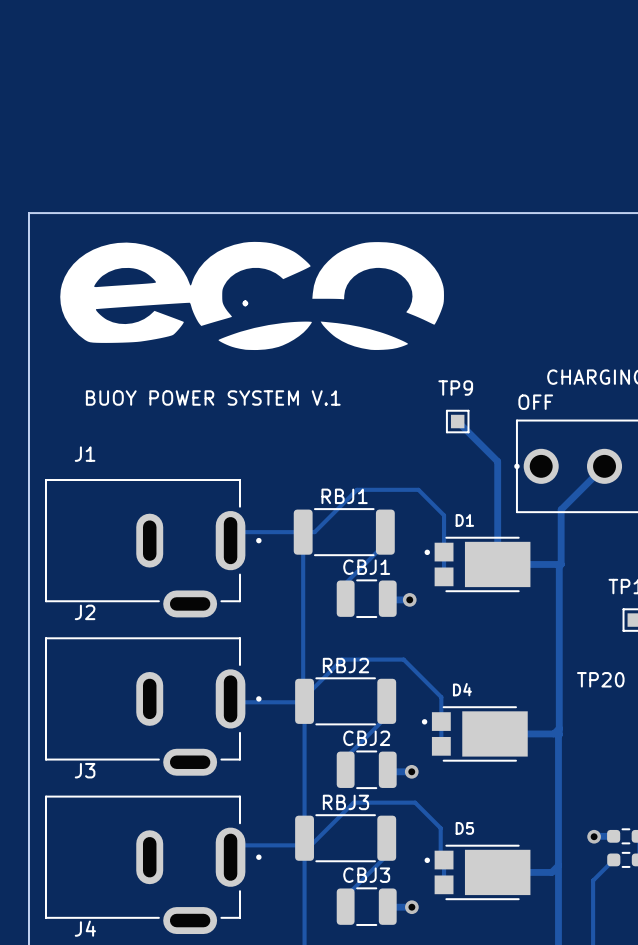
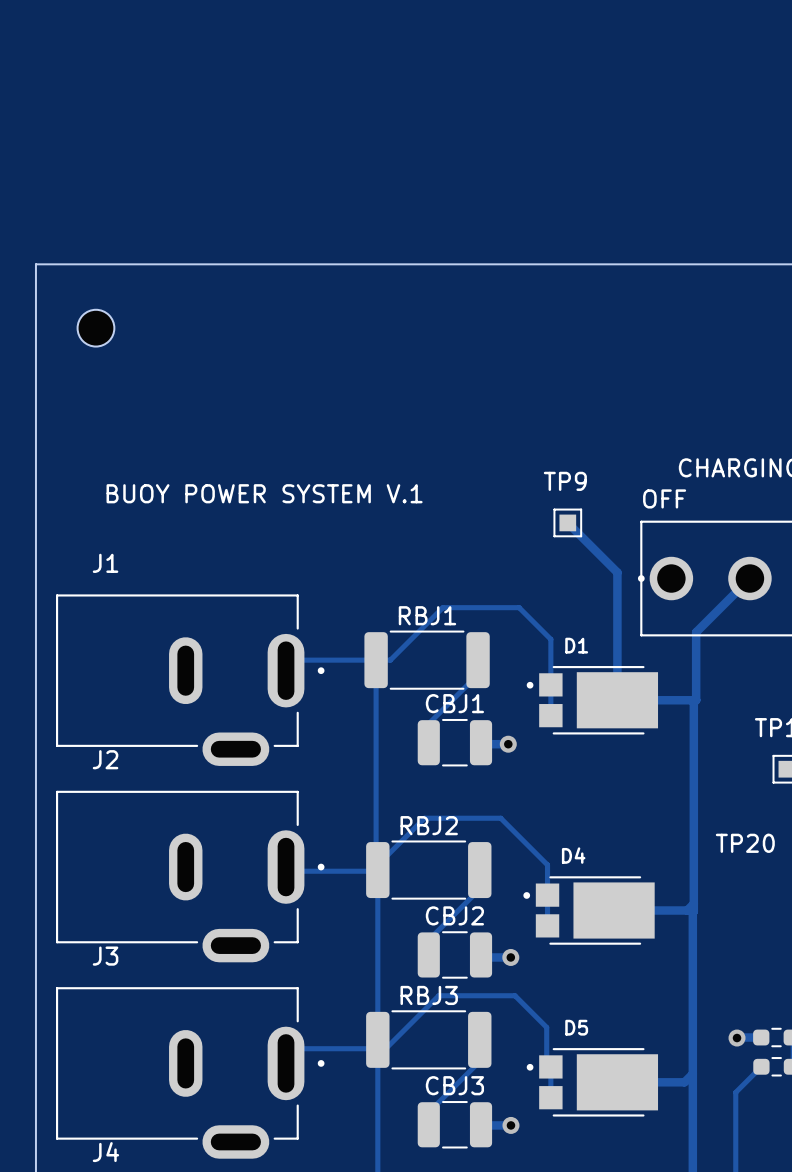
part: none -> (95, 328)
part: (252, 295) -> none

